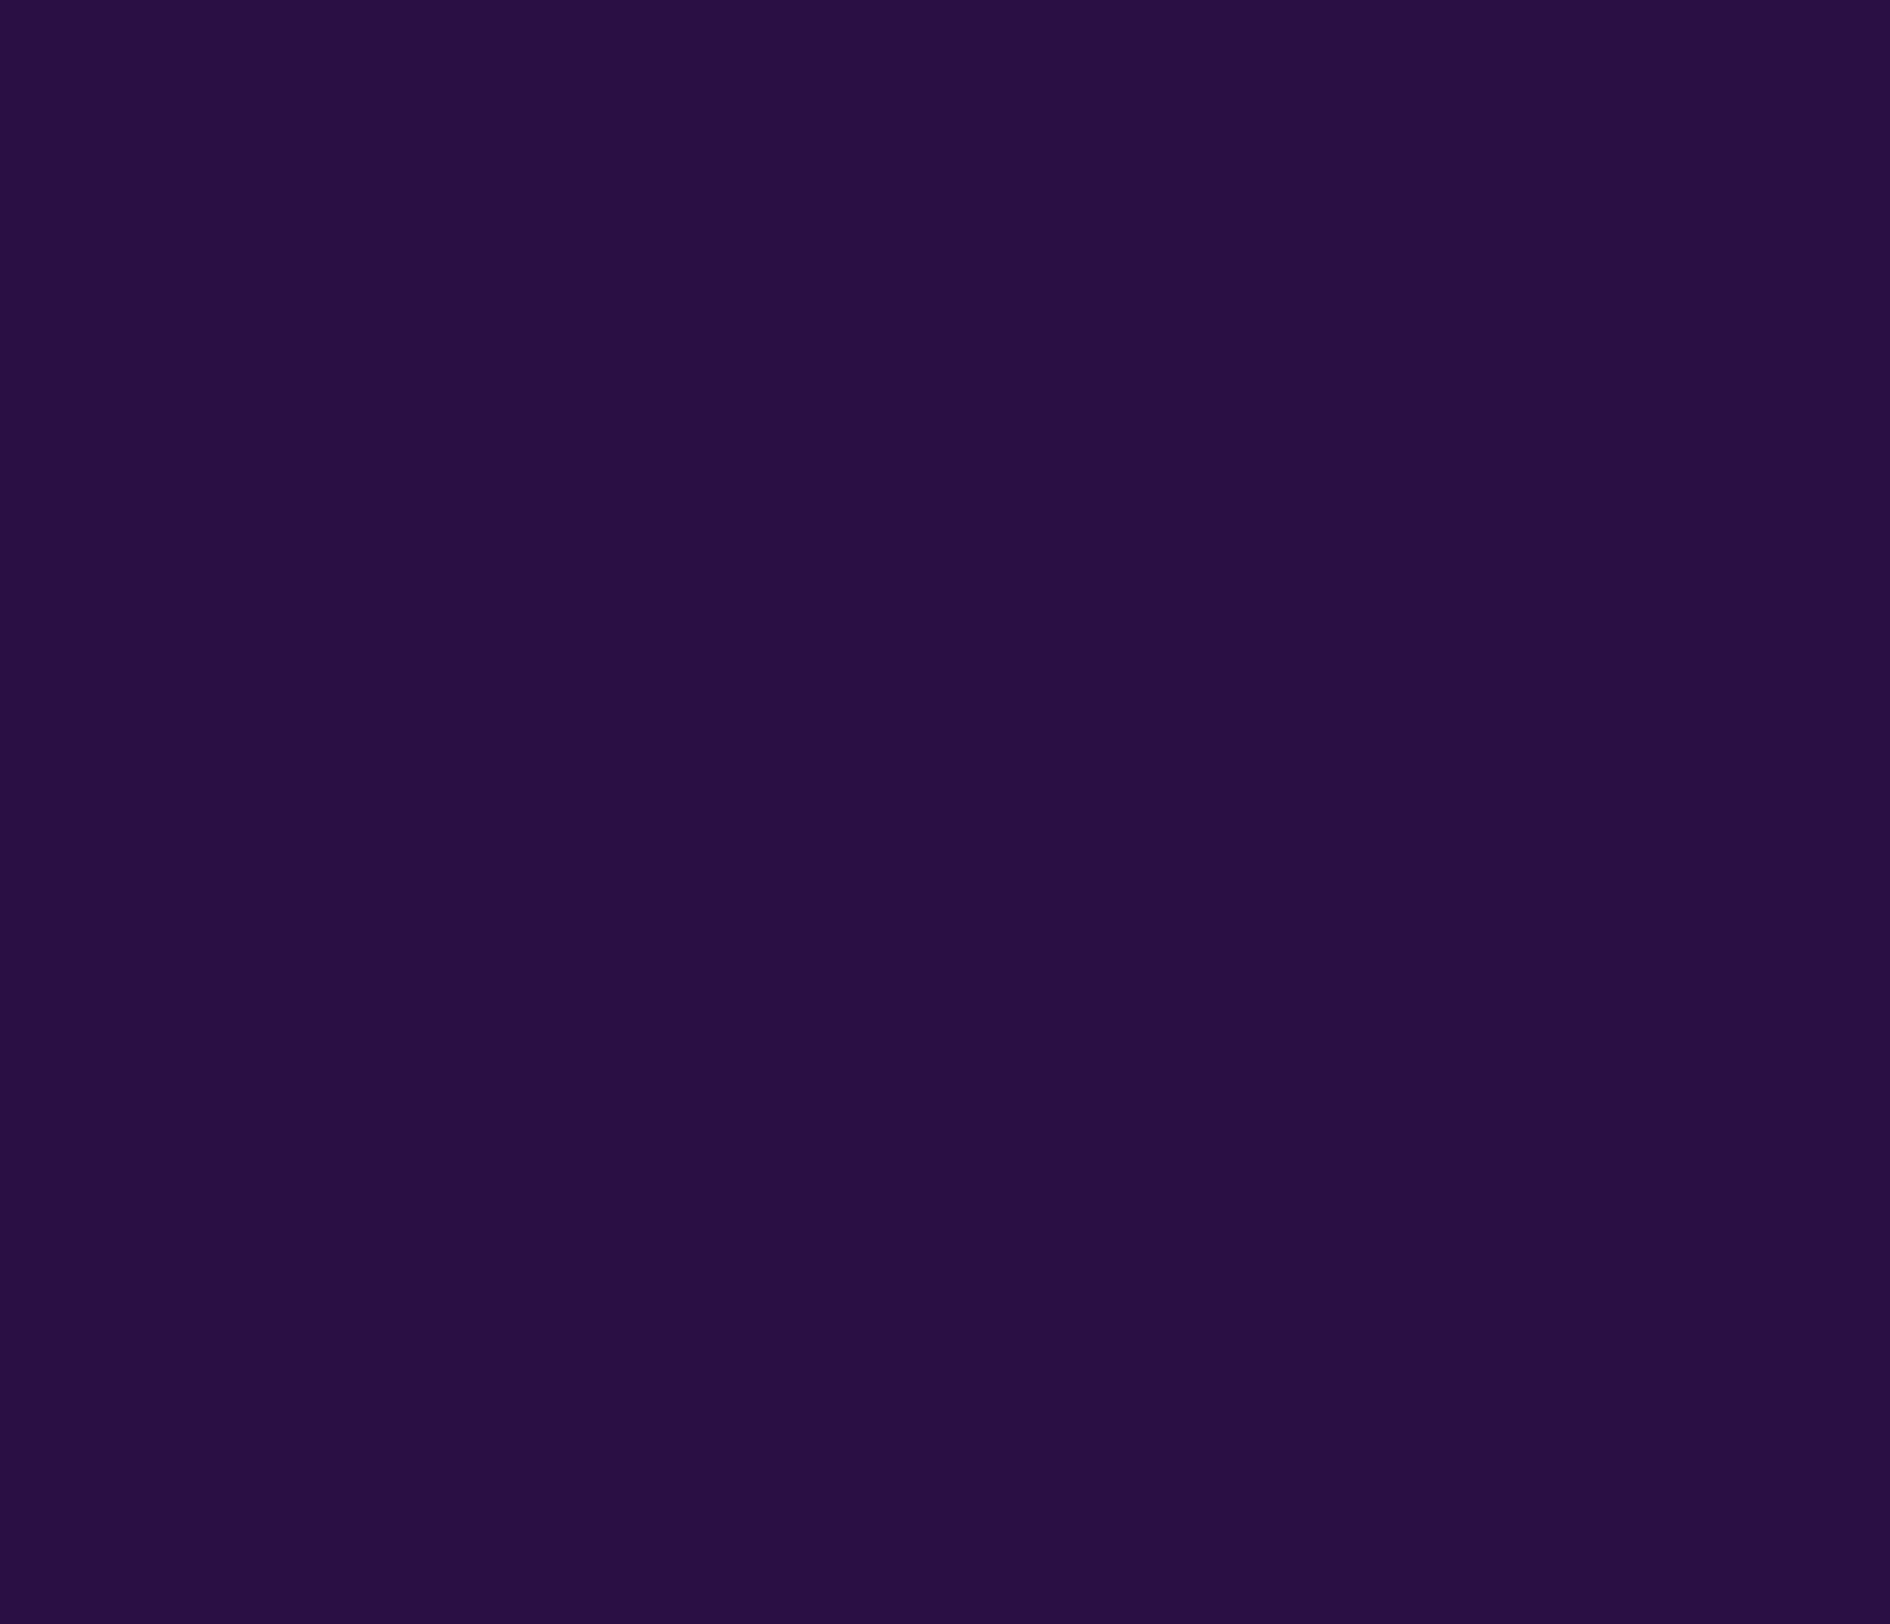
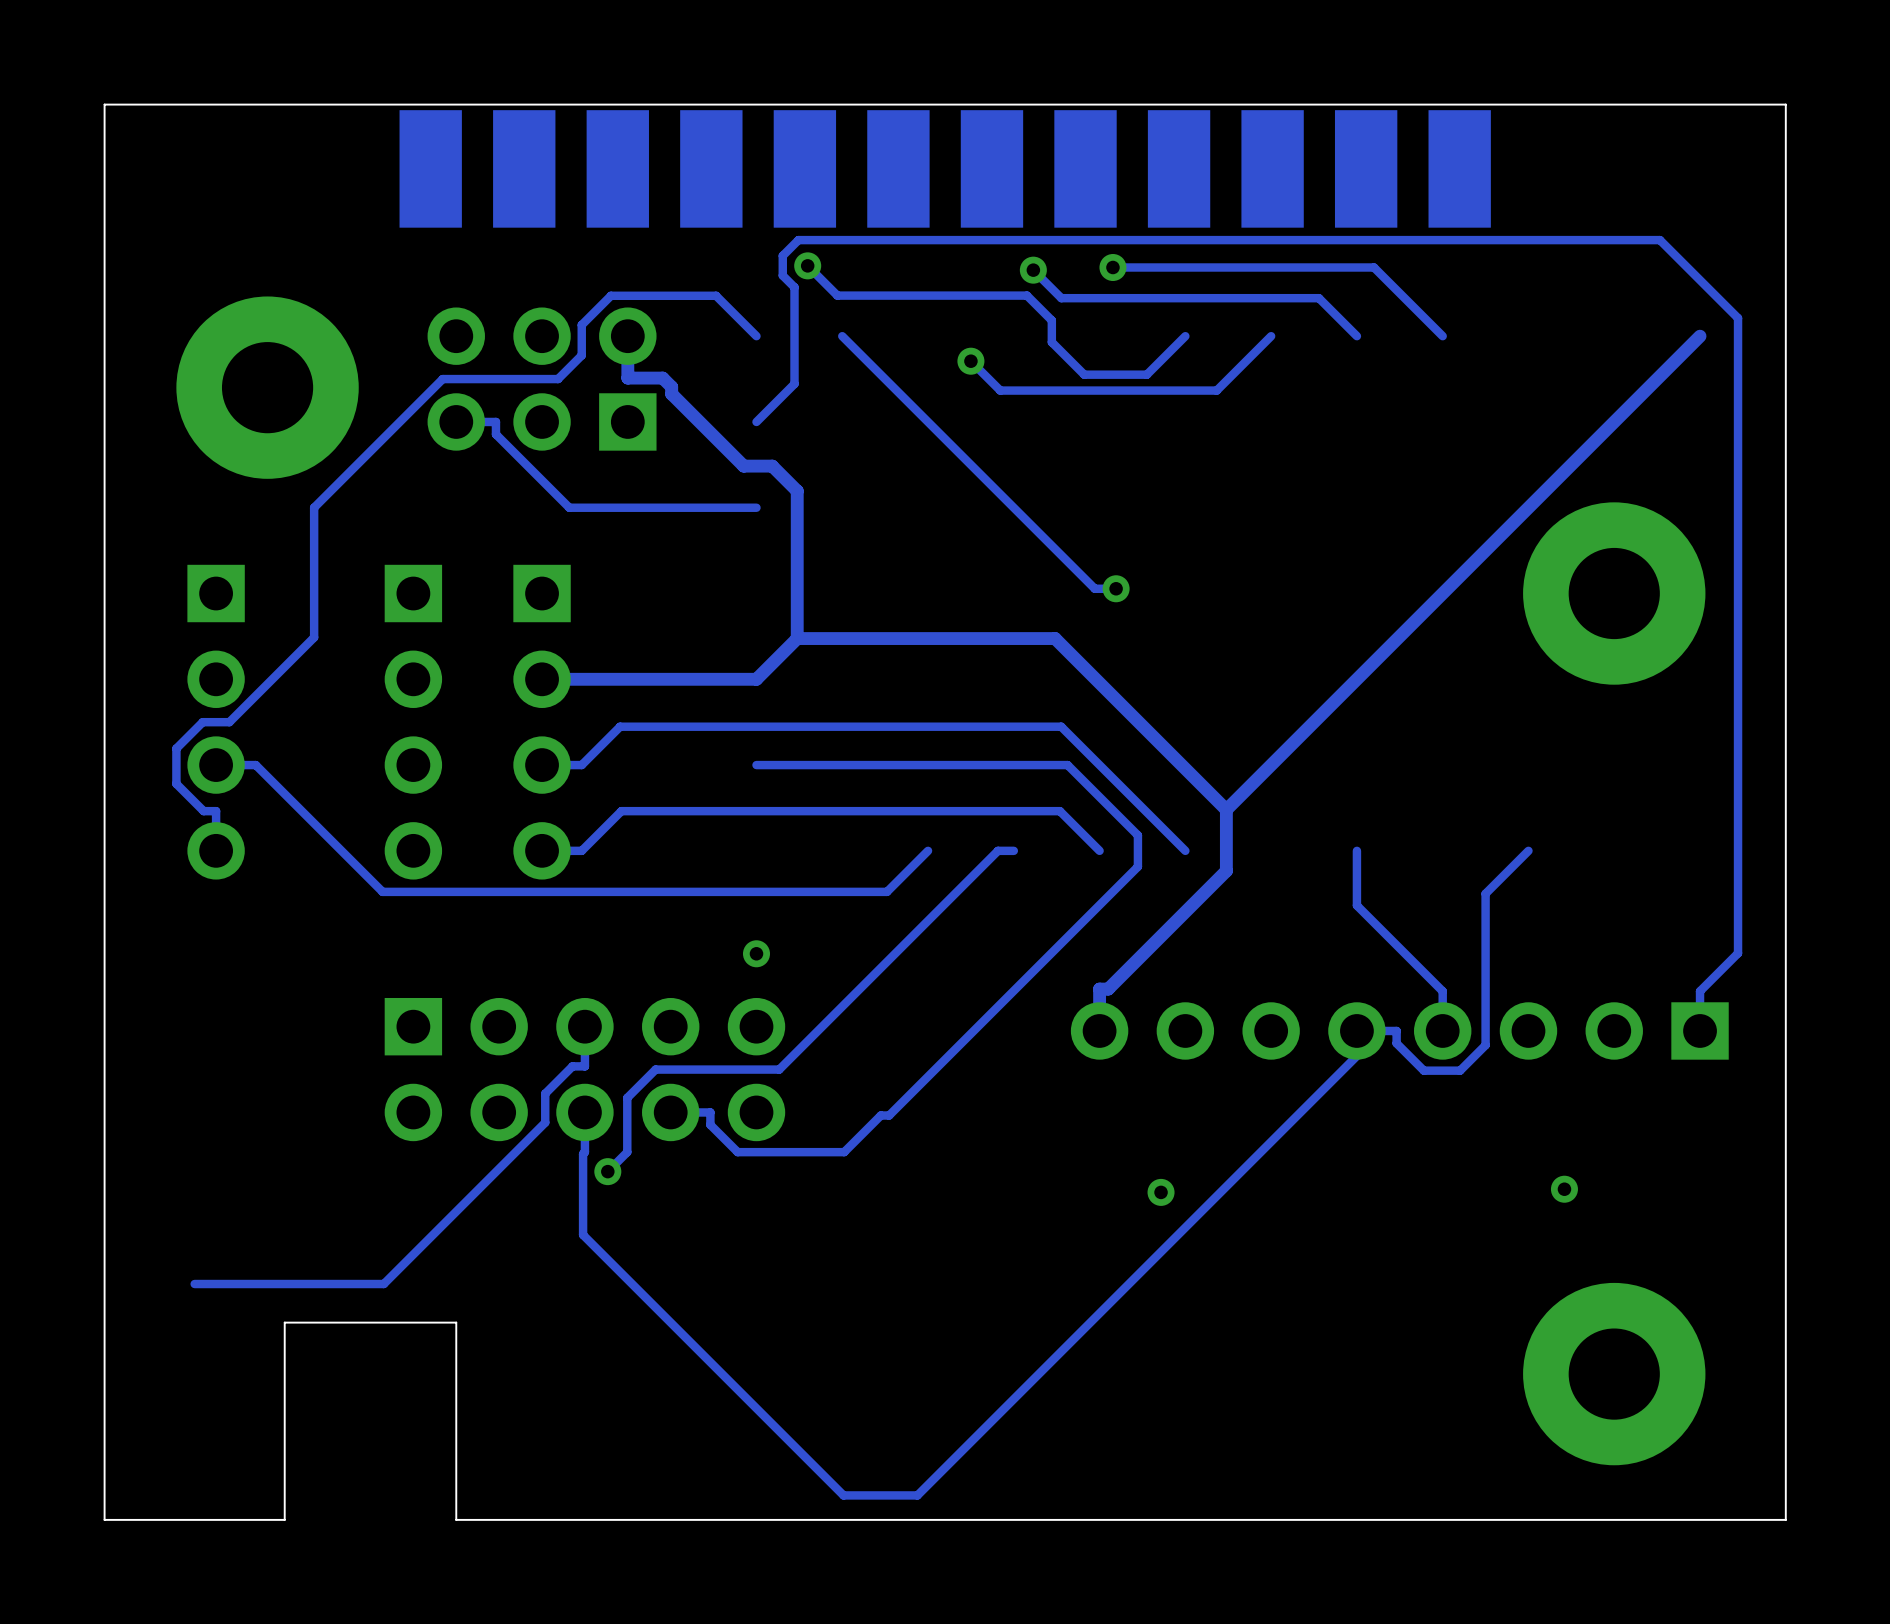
board edge: none -> (1785, 104) (1785, 1519) (456, 1519) (456, 1322) (284, 1322) (284, 1519) (104, 1519) (104, 104) (1785, 104)
part: none -> (945, 168)
track: none -> (807, 265) (837, 295) (1026, 295) (1051, 320) (1051, 342) (1084, 374) (1146, 374) (1185, 336)
via: none -> (807, 265)
track: none -> (1112, 267) (1374, 267) (1442, 336)
via: none -> (1112, 267)
track: none -> (1033, 270) (1061, 298) (1318, 298) (1356, 336)
via: none -> (1033, 270)
track: none -> (627, 336) (627, 378) (662, 378) (671, 387) (671, 394) (743, 466) (772, 466) (797, 491) (797, 638)
track: none -> (756, 336) (716, 295) (610, 295) (581, 324) (581, 355) (558, 379) (442, 379) (314, 507) (314, 637) (229, 722) (202, 722) (176, 748) (176, 783) (203, 811) (216, 811) (216, 850)
track: none -> (842, 336) (1094, 588) (1116, 588)
track: none -> (1271, 336) (1216, 390) (1000, 390) (970, 361)
track: none -> (1700, 336) (1226, 809)
via: none -> (970, 361)
part: none -> (542, 379)
part: none -> (267, 387)
track: none -> (456, 421) (495, 421) (495, 434) (569, 507) (756, 507)
track: none -> (756, 421) (794, 383) (794, 287) (782, 275) (782, 255) (798, 240) (1659, 240) (1738, 318) (1738, 953) (1700, 991) (1700, 1030)
via: none -> (1116, 588)
part: none -> (1614, 593)
track: none -> (797, 638) (1055, 638) (1226, 809)
track: none -> (797, 638) (756, 679) (542, 679)
part: none -> (216, 722)
part: none -> (413, 722)
part: none -> (542, 722)
track: none -> (216, 765) (255, 765) (382, 891) (887, 891) (928, 850)
track: none -> (542, 765) (581, 765) (620, 726) (1061, 726) (1185, 850)
track: none -> (756, 765) (1067, 765) (1137, 835) (1137, 866) (889, 1115) (880, 1115) (844, 1152) (737, 1152) (710, 1124) (710, 1112) (670, 1112)
track: none -> (1226, 809) (1226, 870) (1108, 989) (1099, 989) (1099, 1030)
track: none -> (1013, 850) (997, 850) (779, 1069) (655, 1069) (627, 1097) (627, 1152) (607, 1171)
track: none -> (1099, 850) (1059, 811) (621, 811) (581, 850) (542, 850)
track: none -> (1356, 850) (1356, 905) (1442, 991) (1442, 1030)
track: none -> (1528, 850) (1485, 893) (1485, 1045) (1460, 1070) (1423, 1070) (1396, 1043) (1396, 1030) (1356, 1030)
via: none -> (756, 953)
track: none -> (584, 1026) (584, 1066) (572, 1066) (545, 1093) (545, 1122) (383, 1284) (194, 1284)
track: none -> (1376, 1030) (1376, 1036) (917, 1495) (843, 1495) (583, 1234) (584, 1112)
part: none -> (1399, 1030)
part: none -> (584, 1069)
via: none -> (607, 1171)
via: none -> (1564, 1189)
via: none -> (1161, 1192)
part: none -> (1614, 1374)

